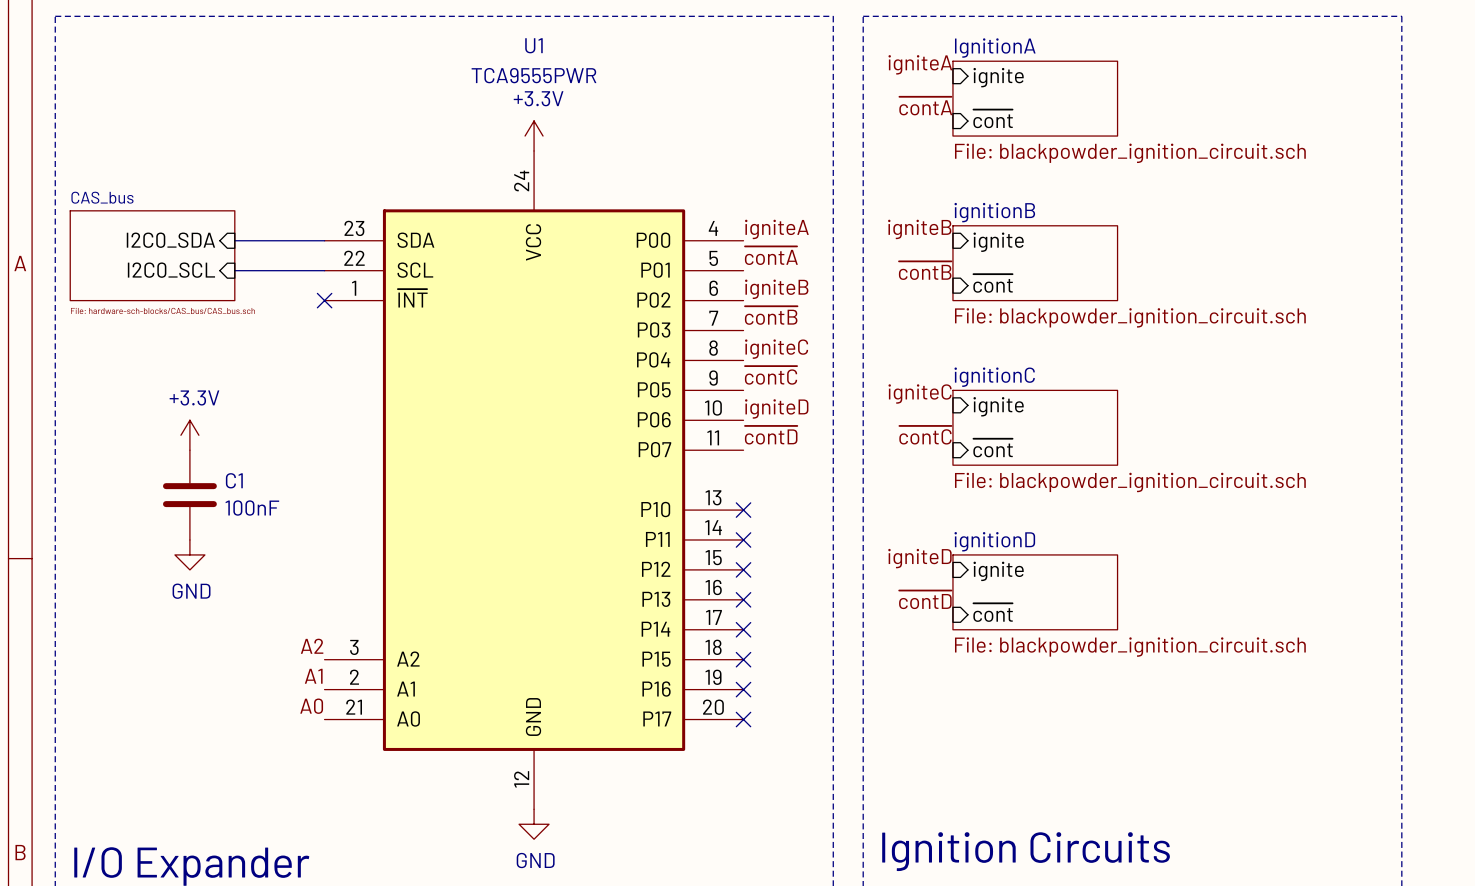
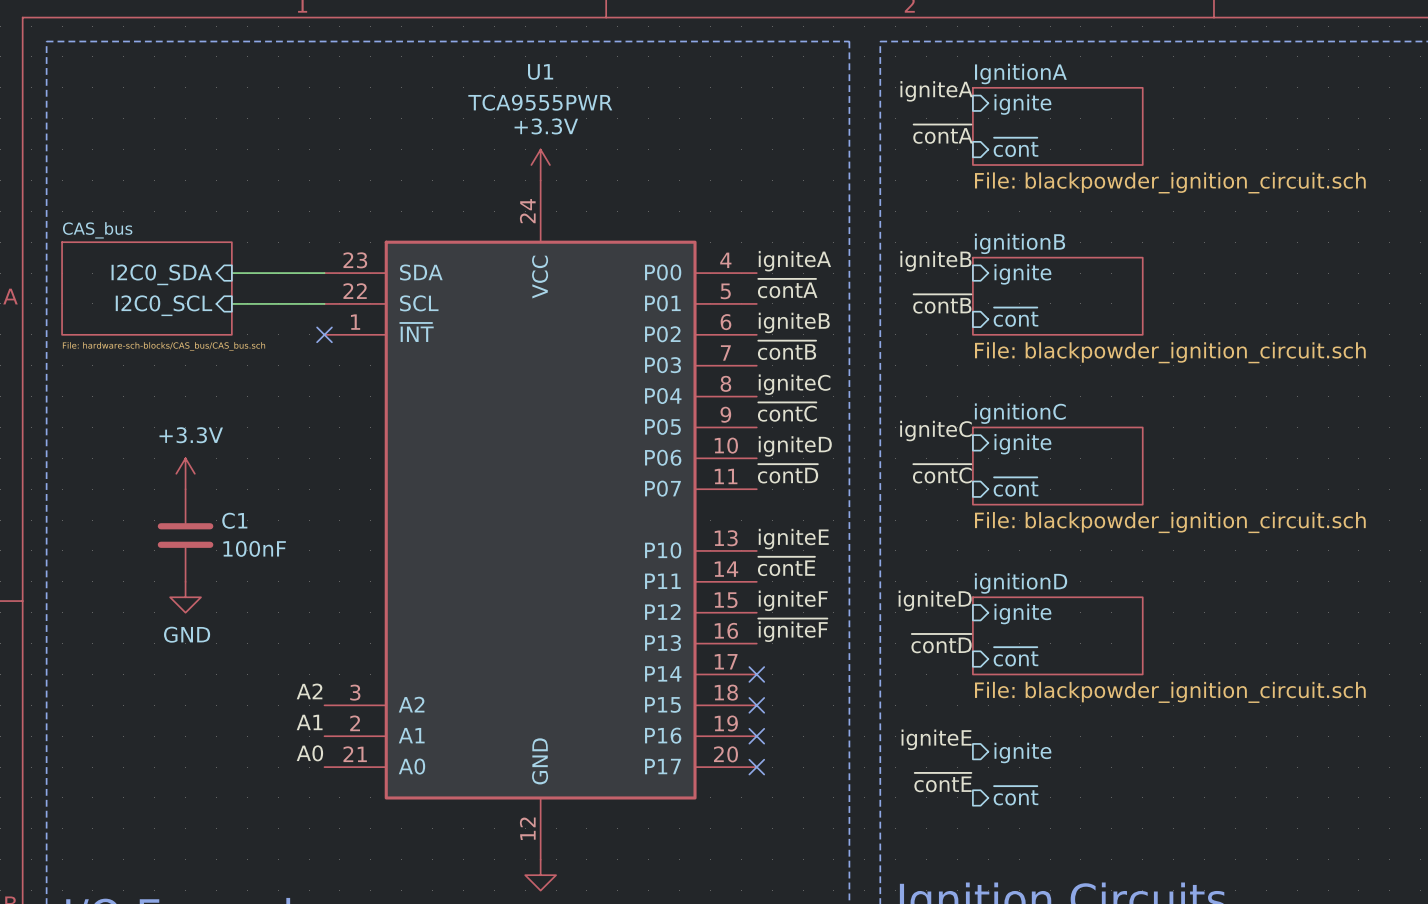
label: none -> igniteE (793, 539)
no-connect mark: (743, 510) -> none
label: none -> ~{contE} (786, 566)
no-connect mark: (743, 539) -> none
label: none -> igniteF (793, 600)
no-connect mark: (743, 569) -> none
label: none -> ~{igniteF} (793, 630)
no-connect mark: (743, 599) -> none
label: none -> igniteE (936, 739)
sheet pin: none -> ignite (1022, 752)
label: none -> ~{contE} (942, 782)
sheet pin: none -> ~{cont} (1016, 795)

